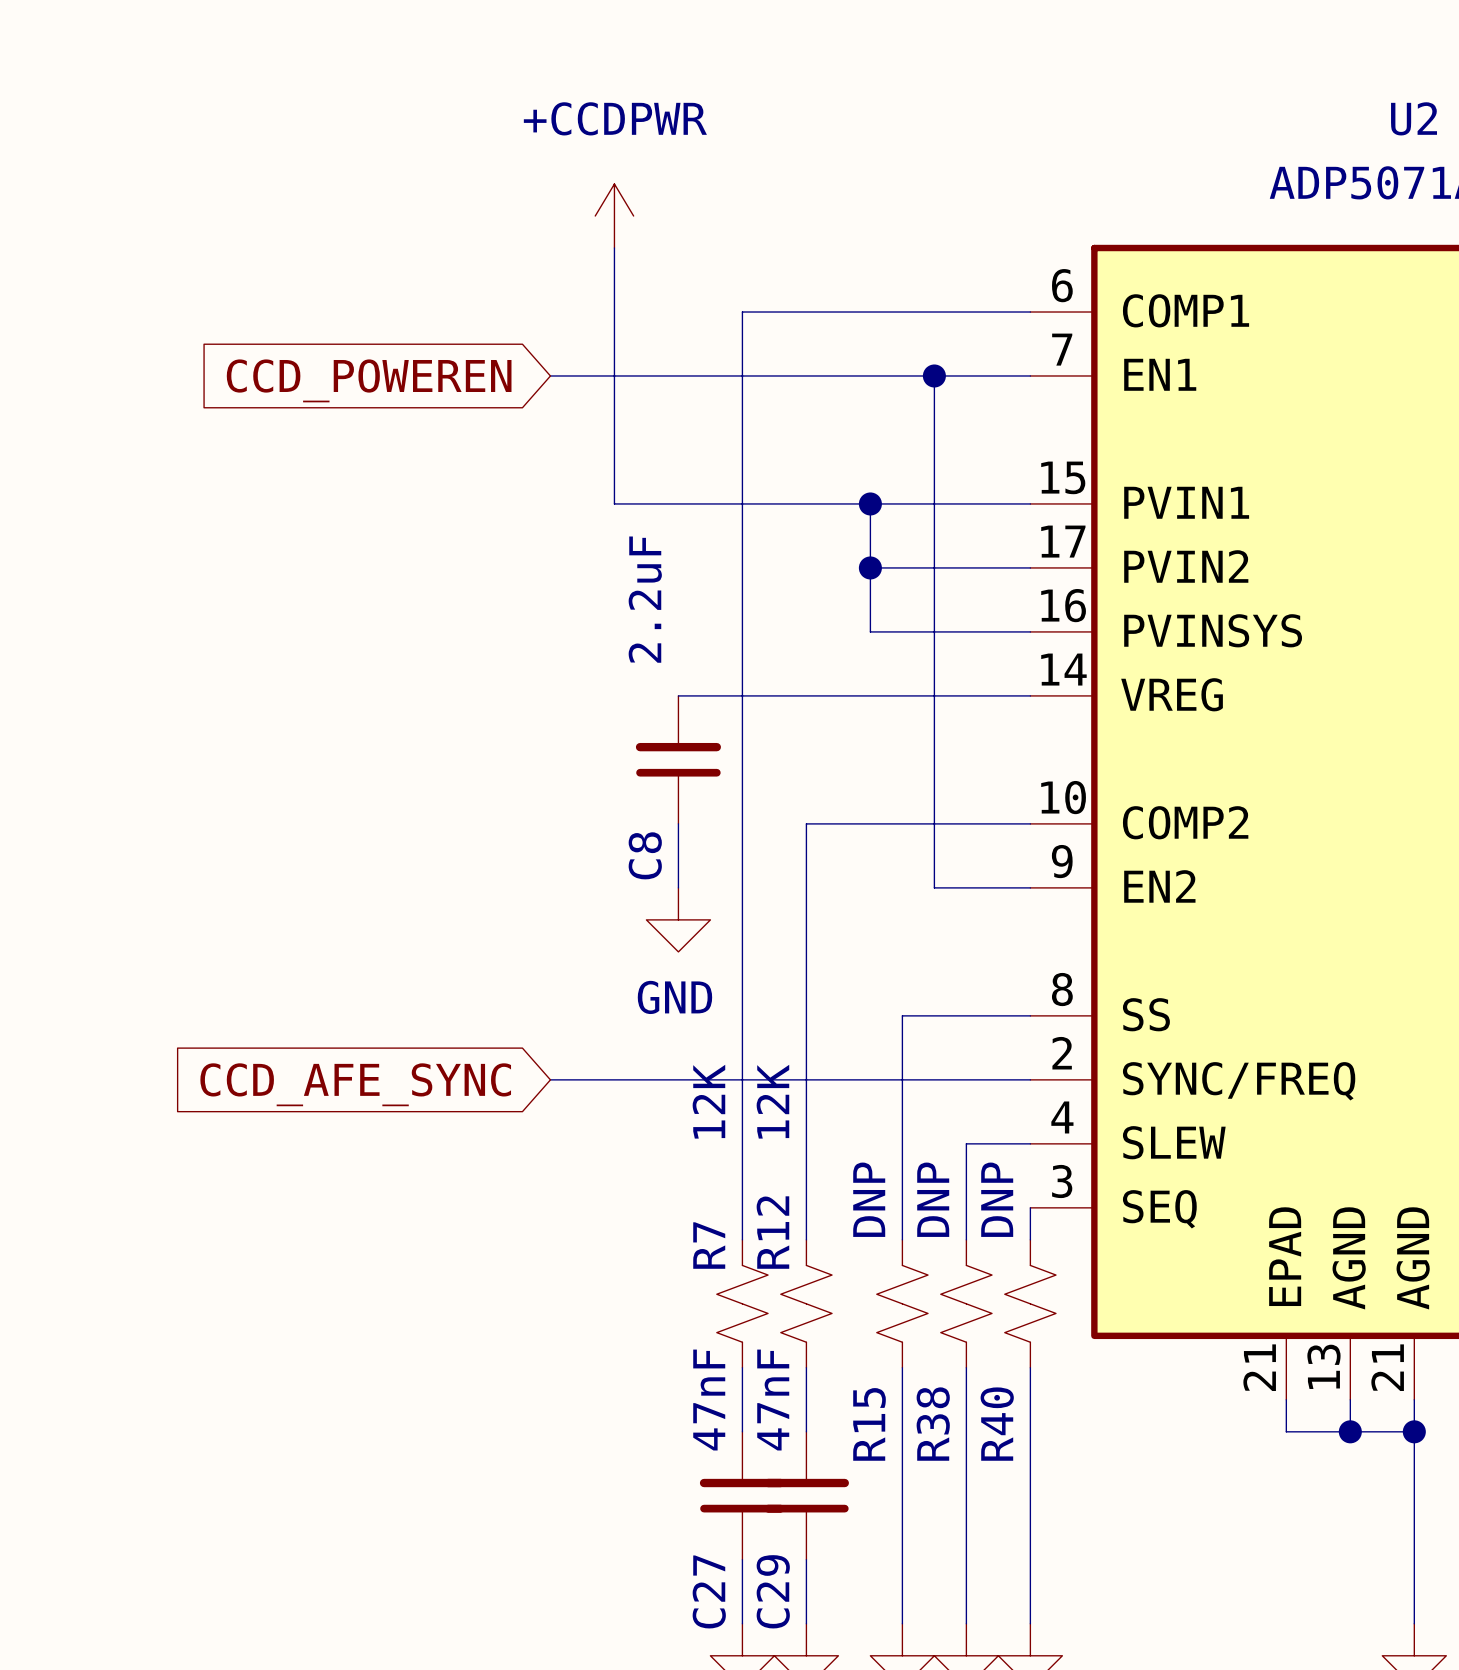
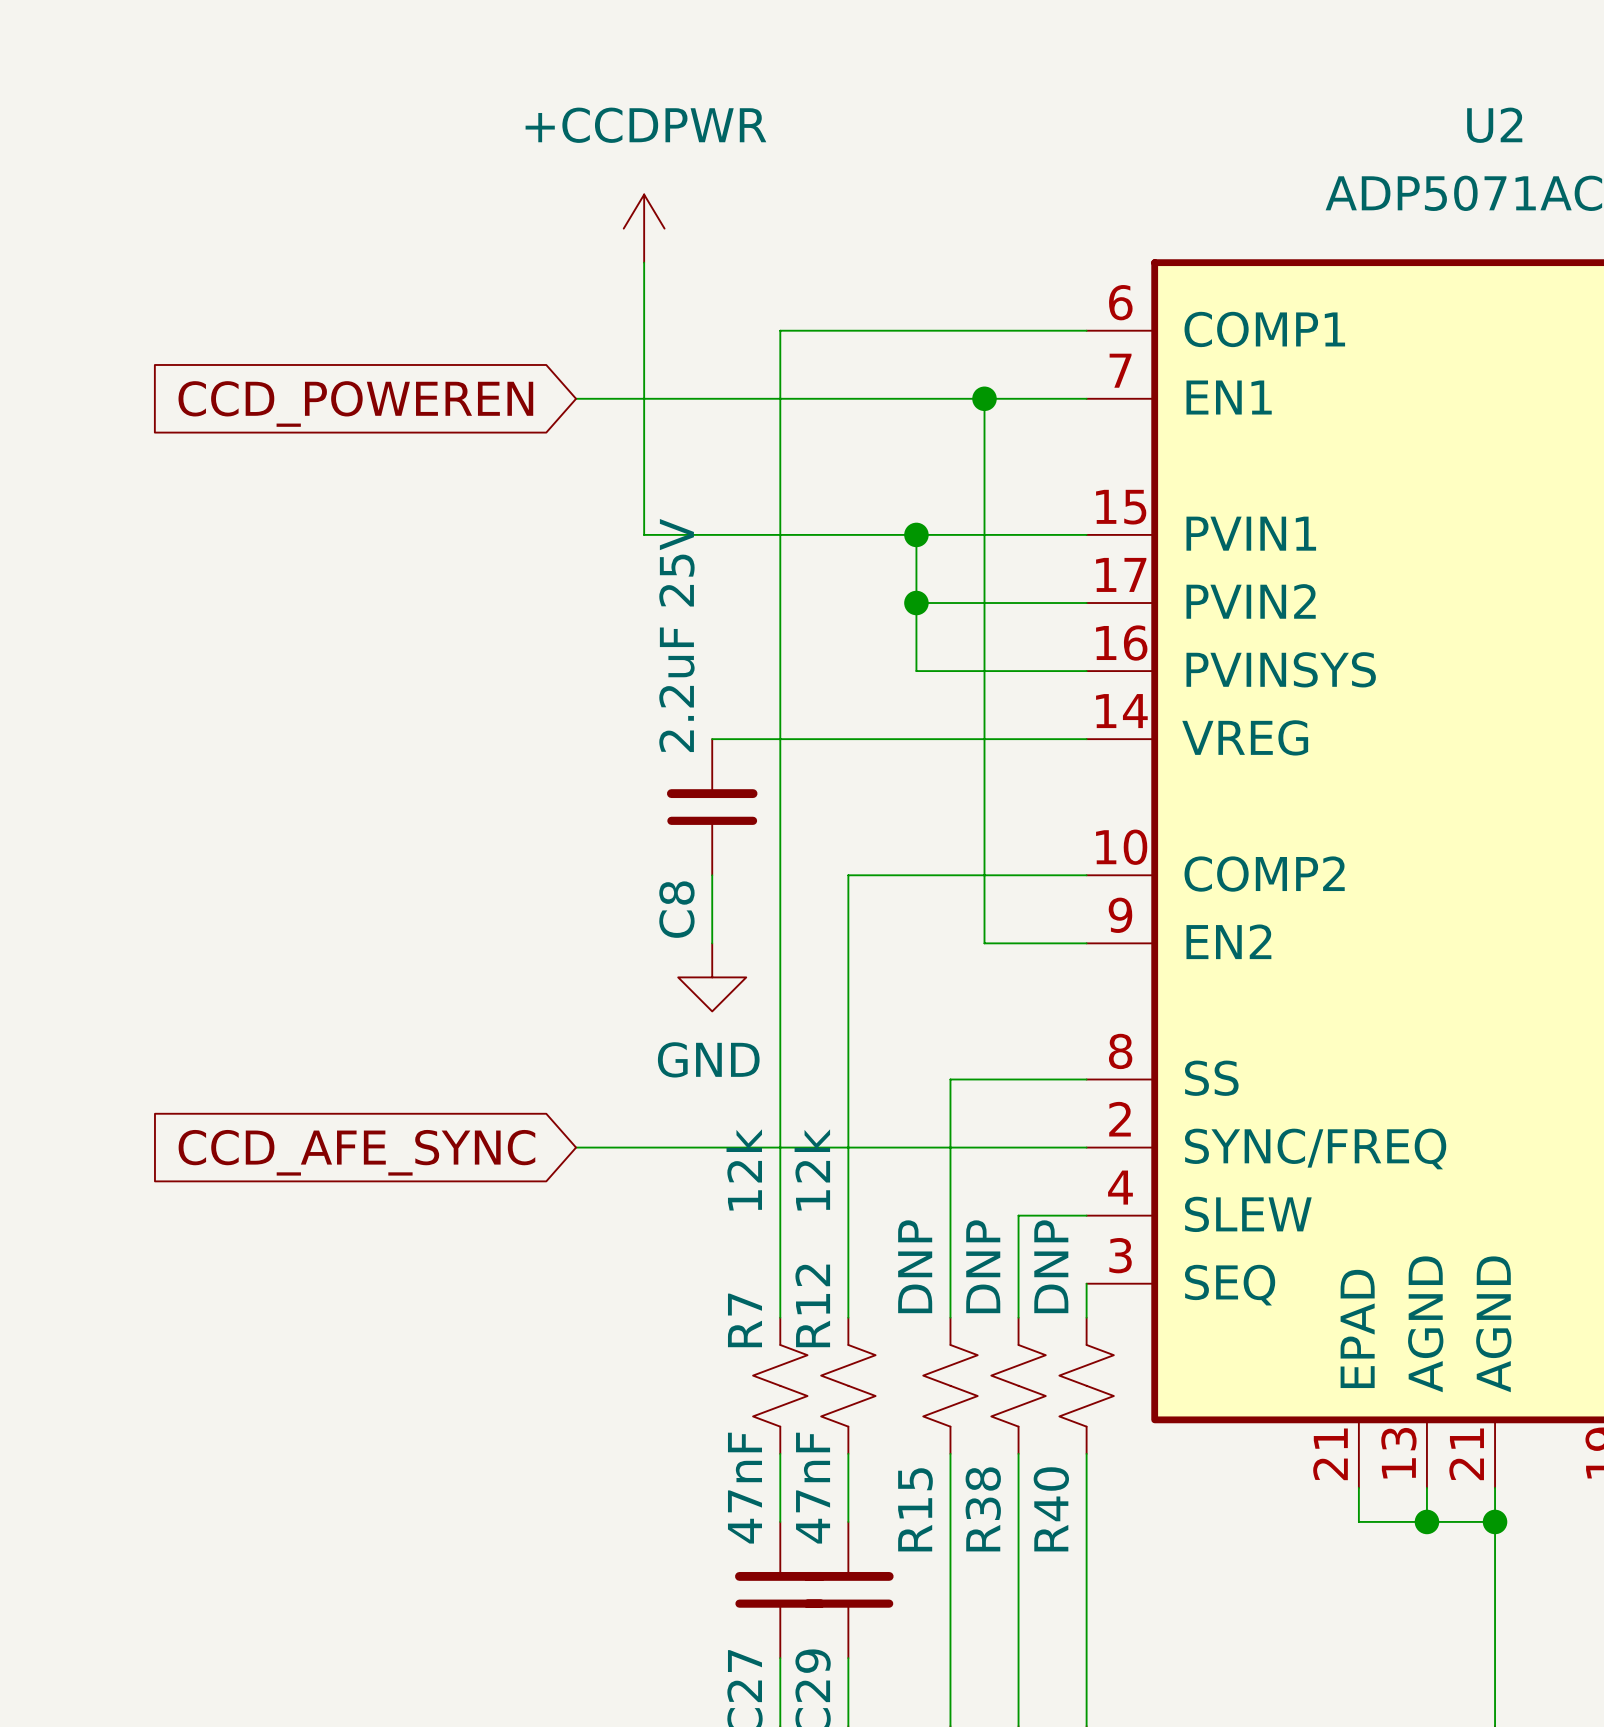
C8 value: 2.2uF (645, 599) -> 2.2uF 25V (676, 635)
R7 value: 12K (708, 1101) -> 12k (744, 1169)
R12 value: 12K (772, 1101) -> 12k (812, 1169)

